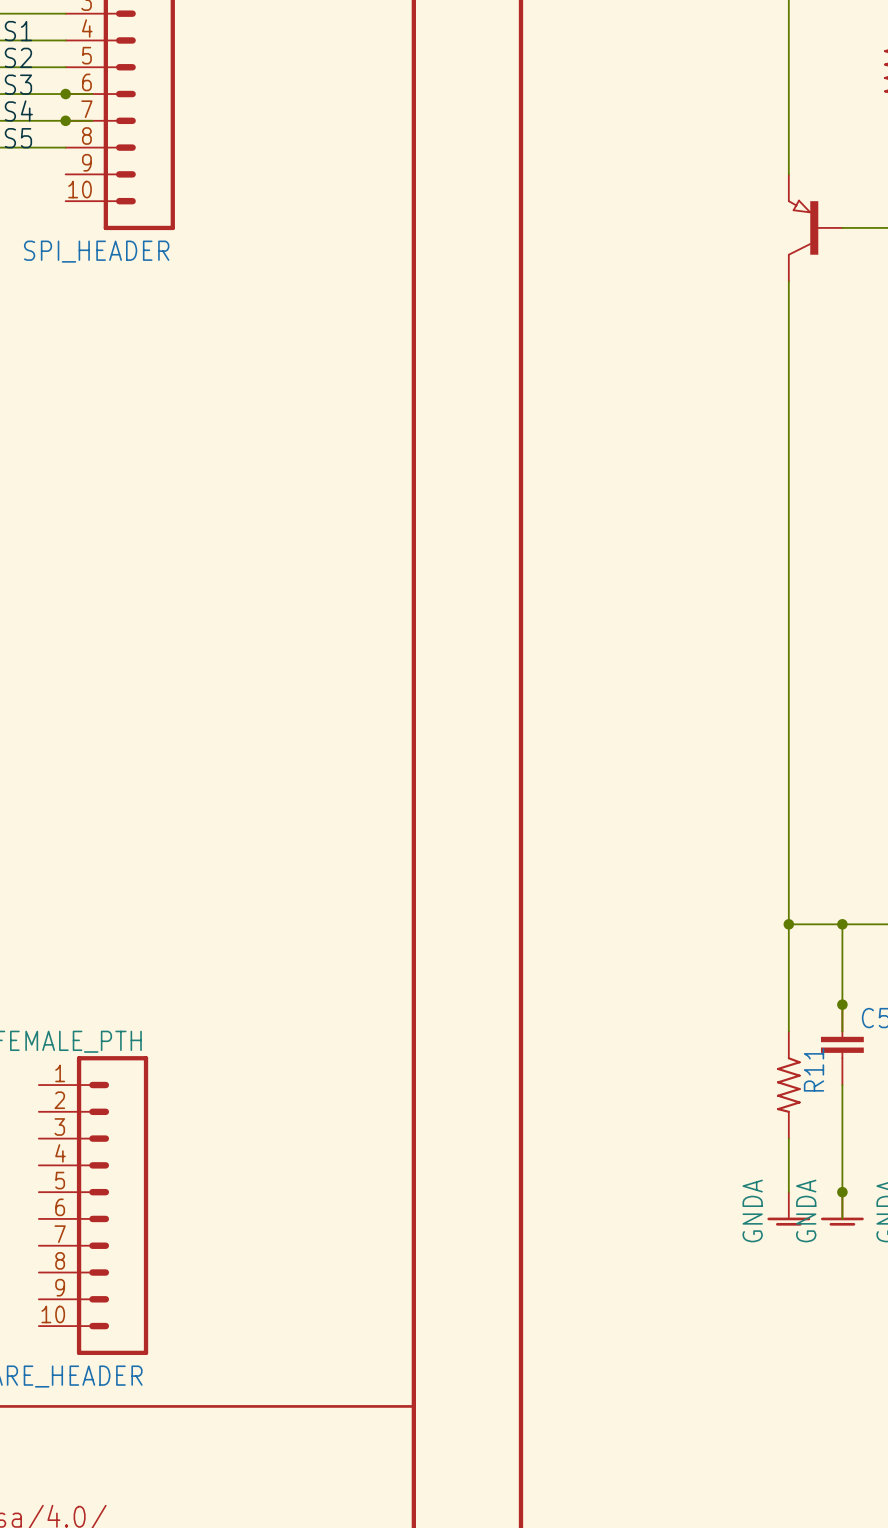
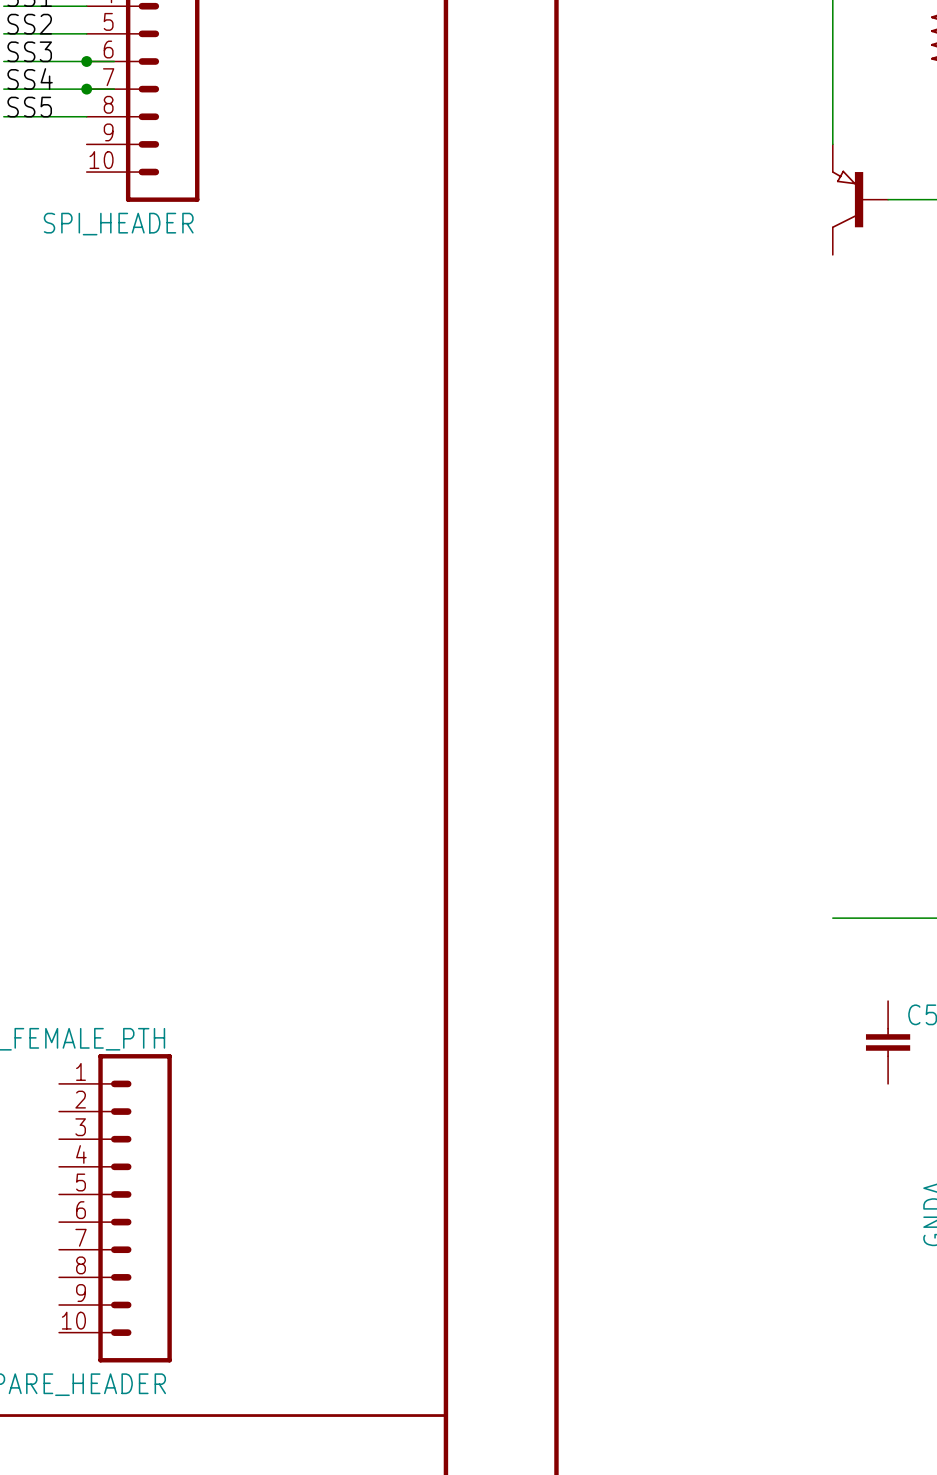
wire: (788, 281) (788, 1031) -> none
junction: (788, 924) -> none
wire: (842, 924) (842, 1031) -> none
junction: (842, 924) -> none
junction: (842, 1004) -> none
R11: (788, 1085) -> none
wire: (842, 1085) (842, 1218) -> none
wire: (788, 1138) (788, 1192) -> none
junction: (842, 1192) -> none
power symbol: GNDA (788, 1208) -> none
power symbol: GNDA (842, 1208) -> none

